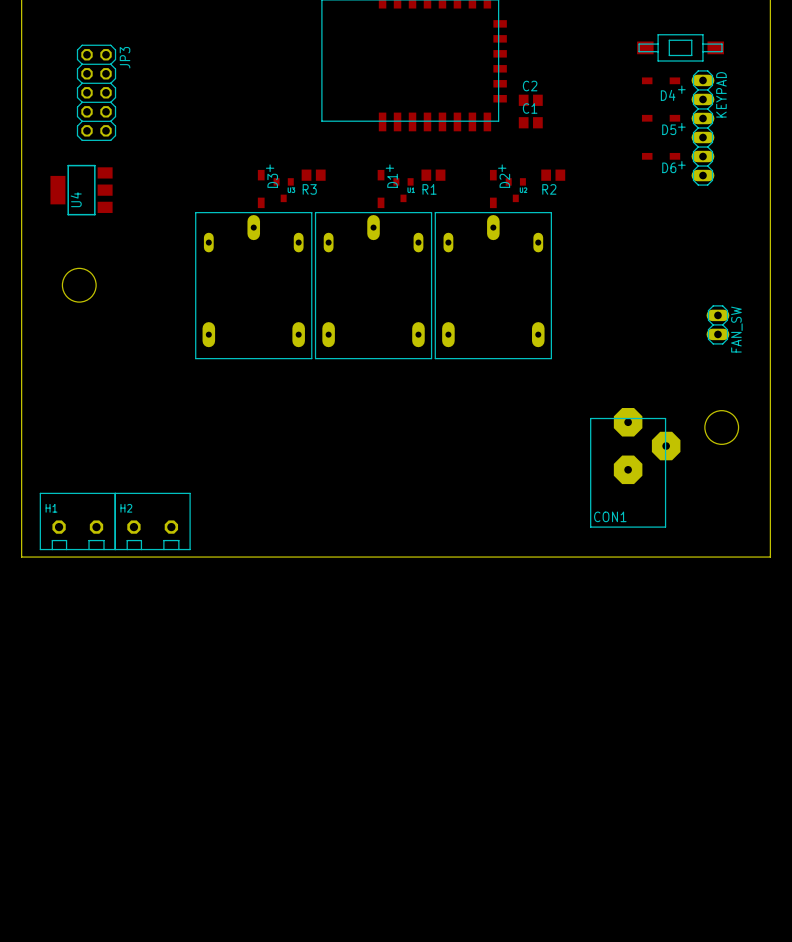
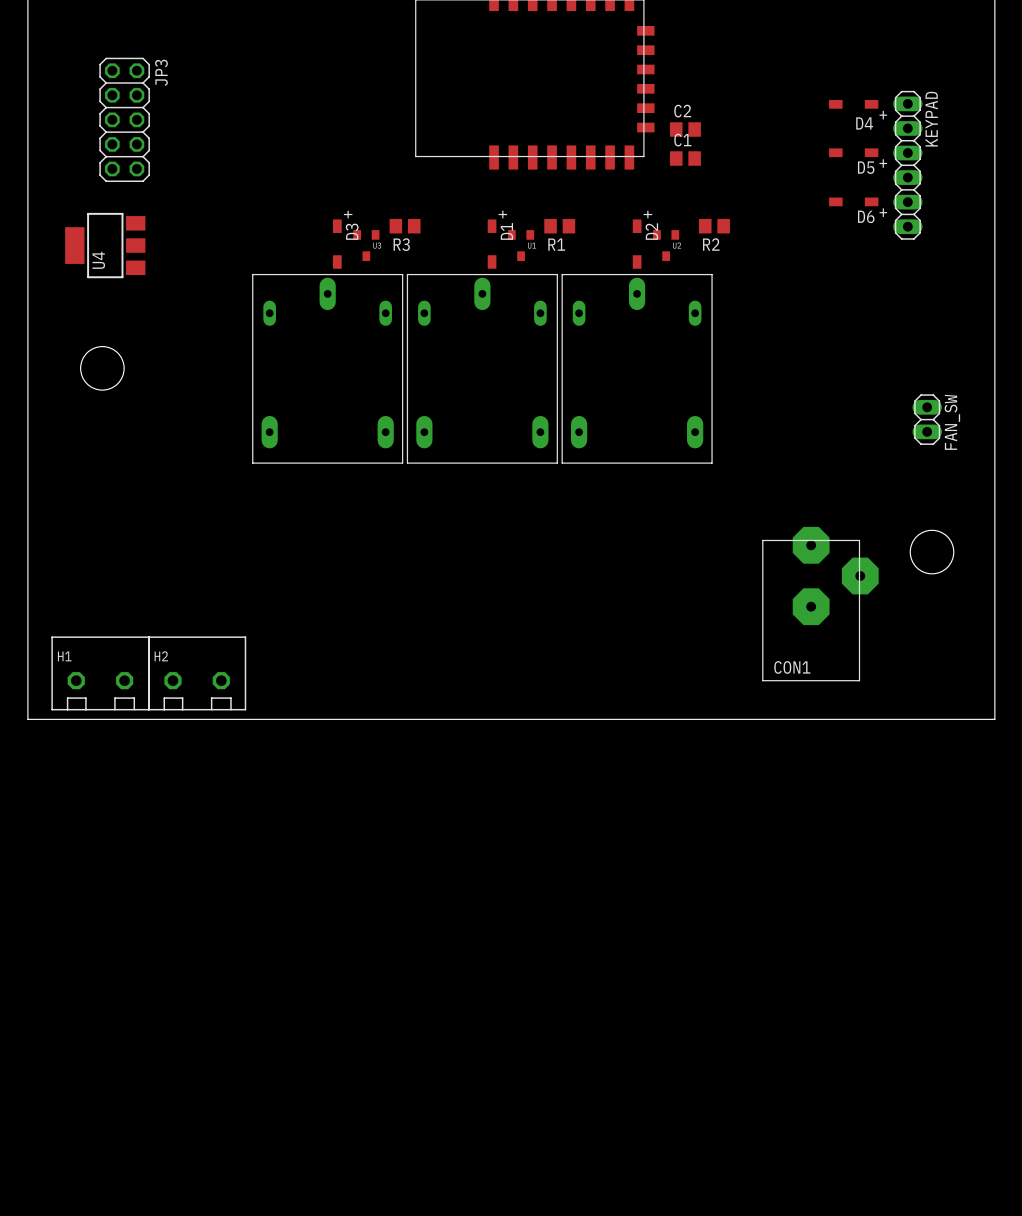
part: (680, 47) -> none

